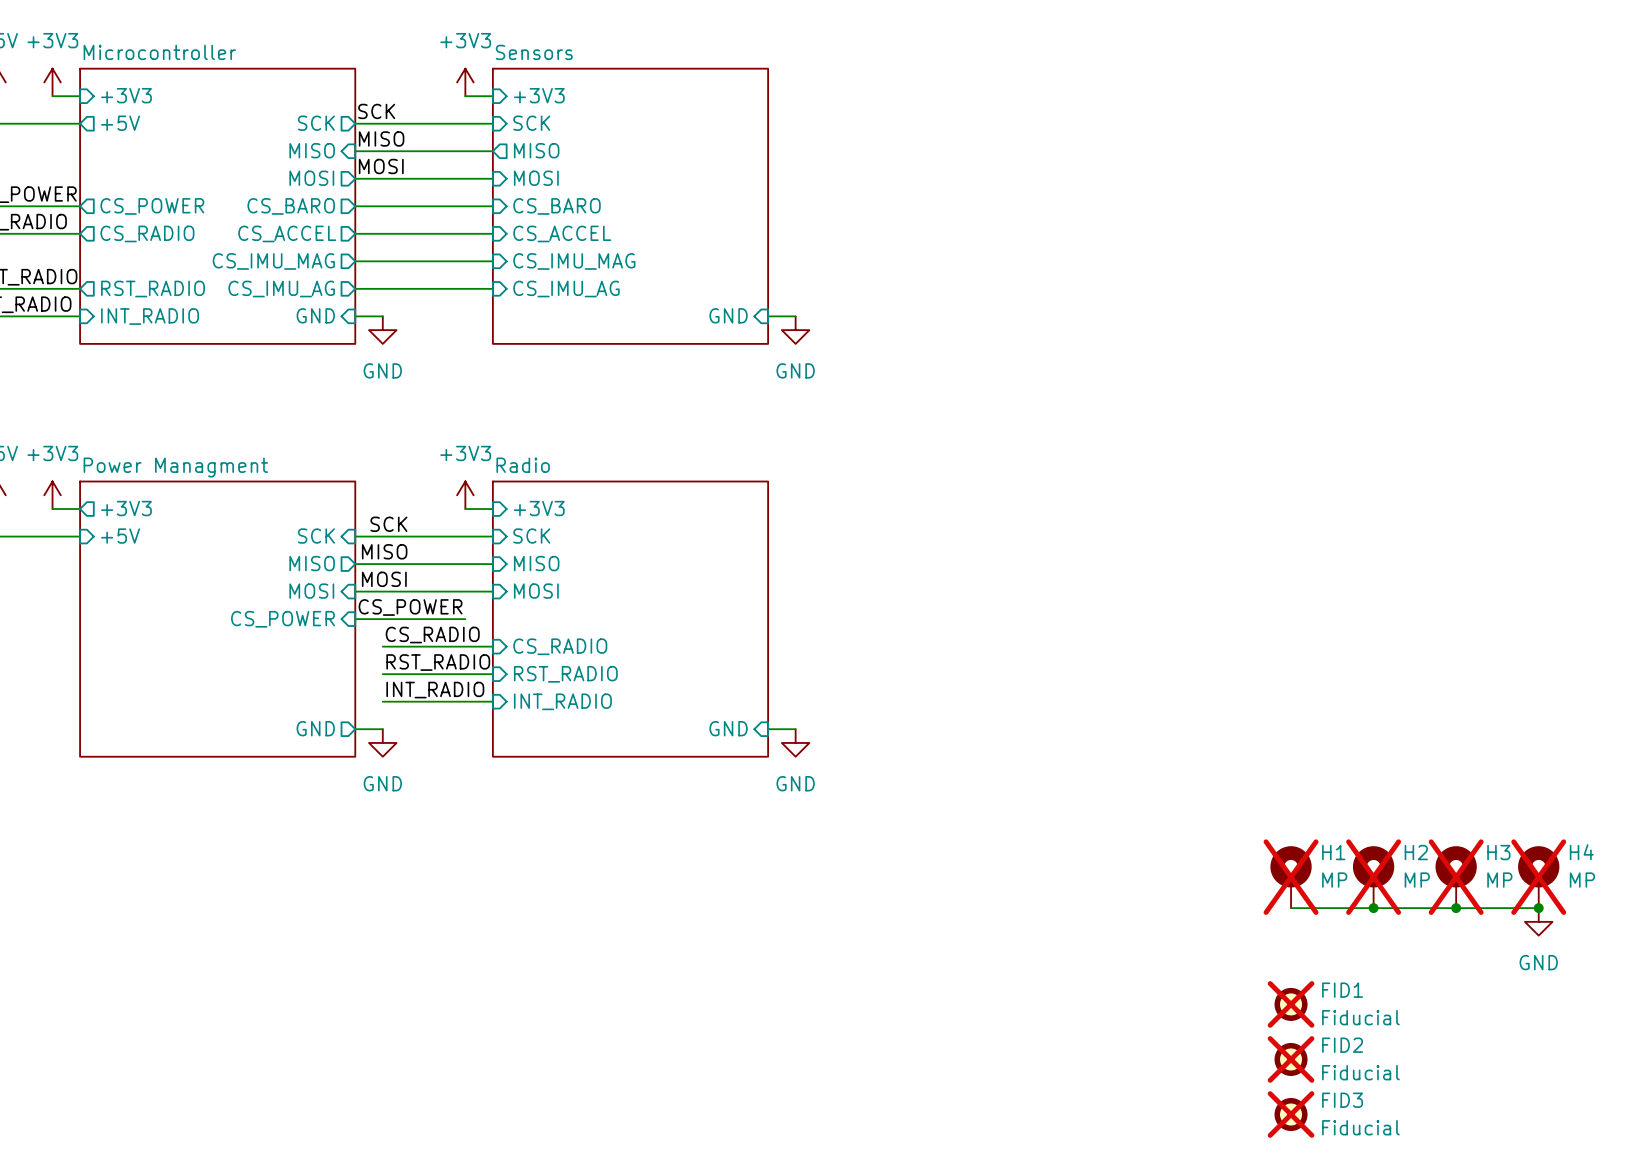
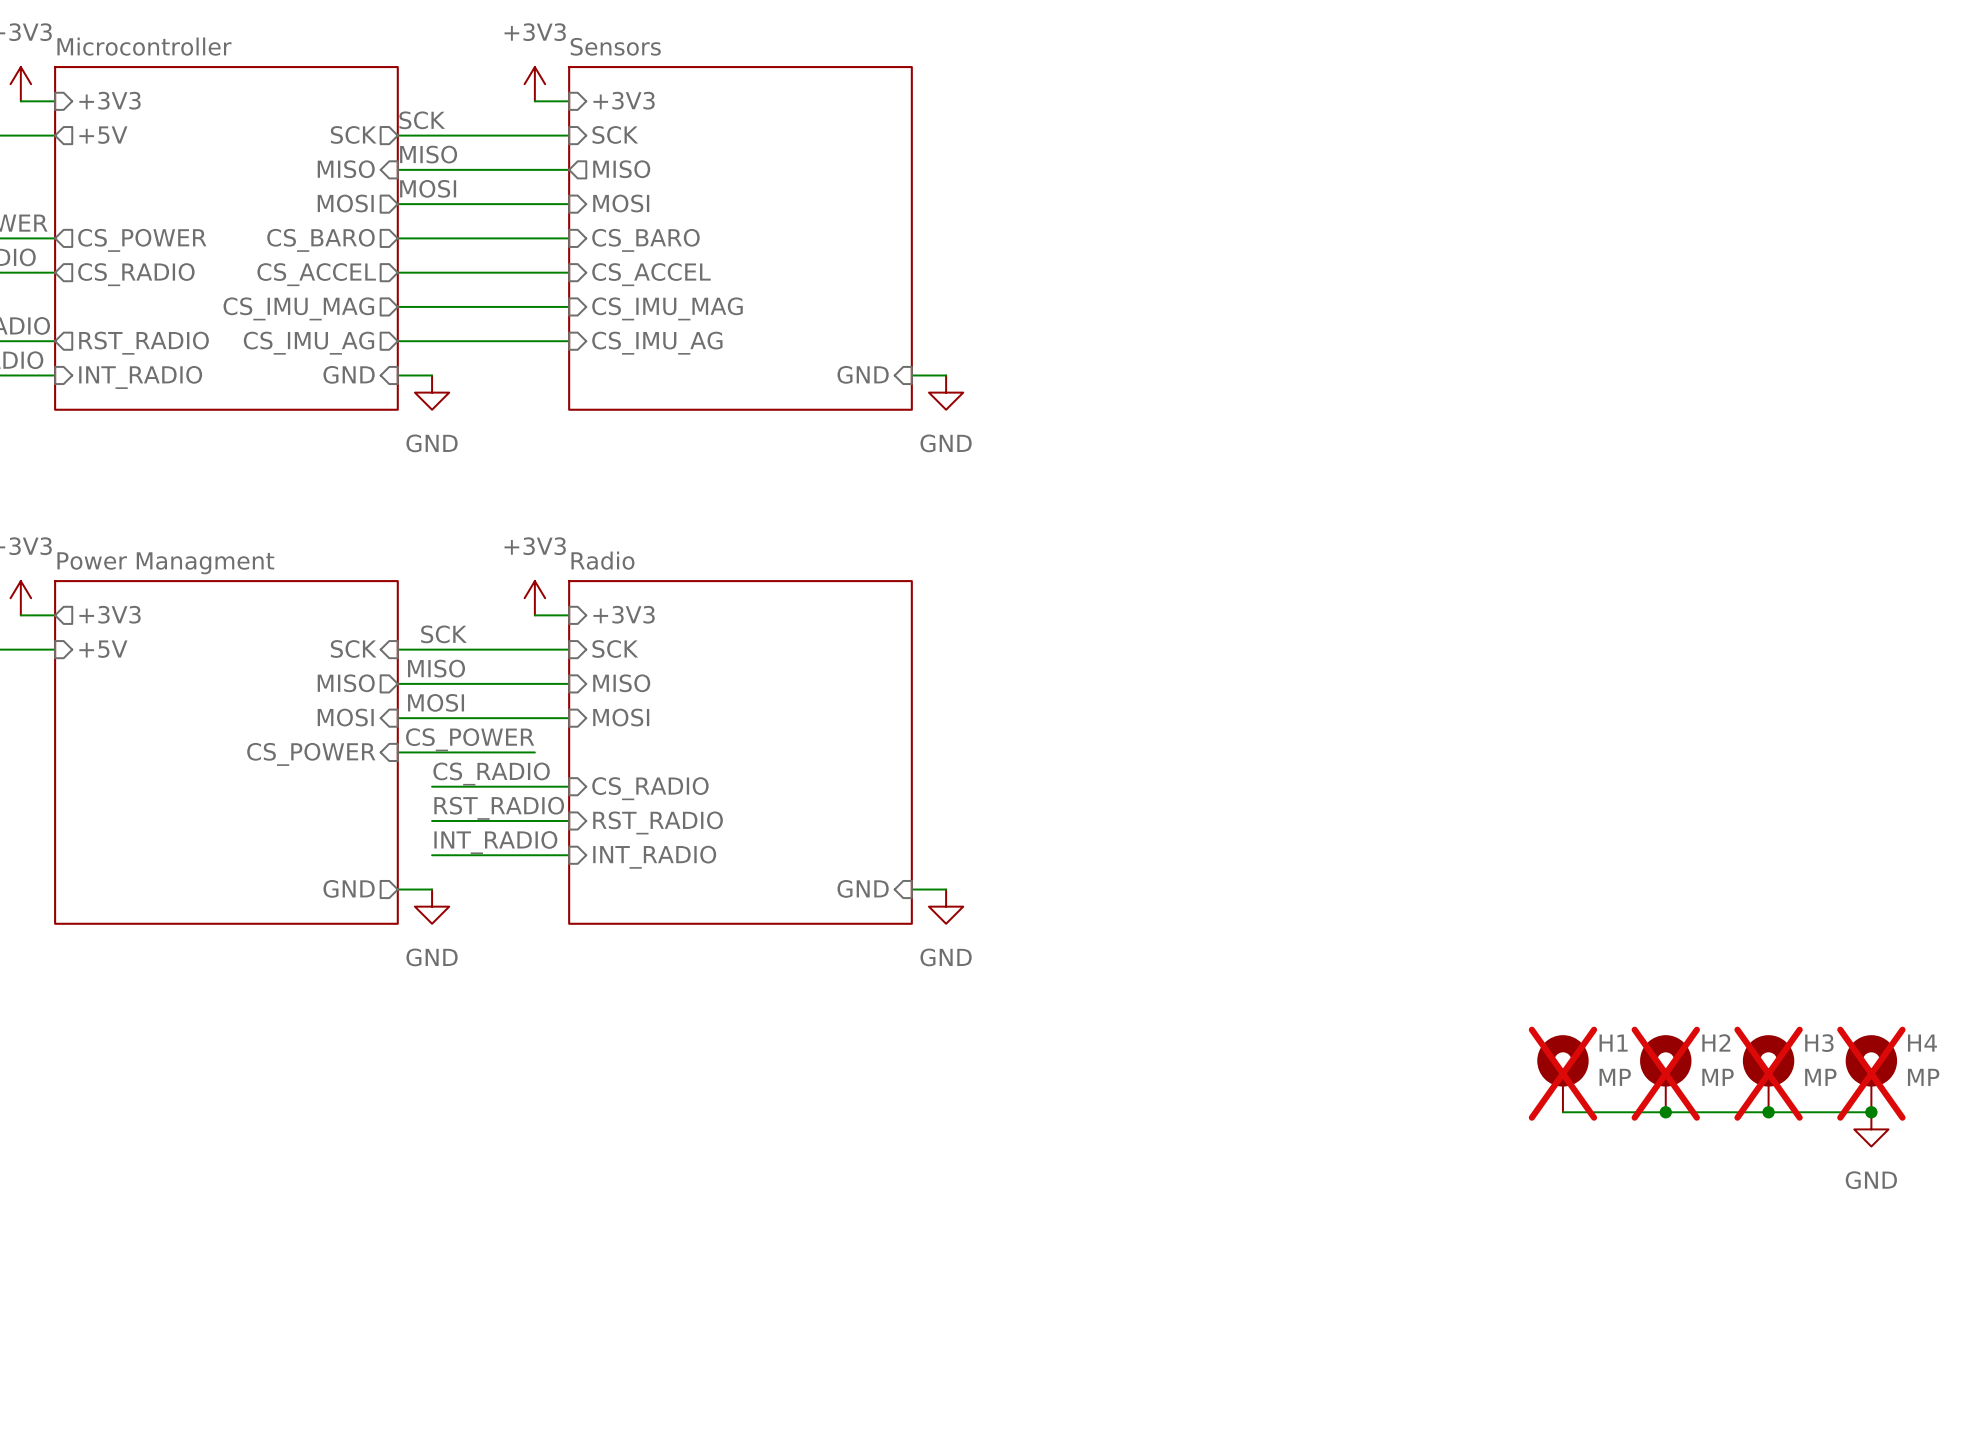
FID1: Fiducial (1291, 1004) -> none
FID2: Fiducial (1291, 1059) -> none
FID3: Fiducial (1291, 1114) -> none

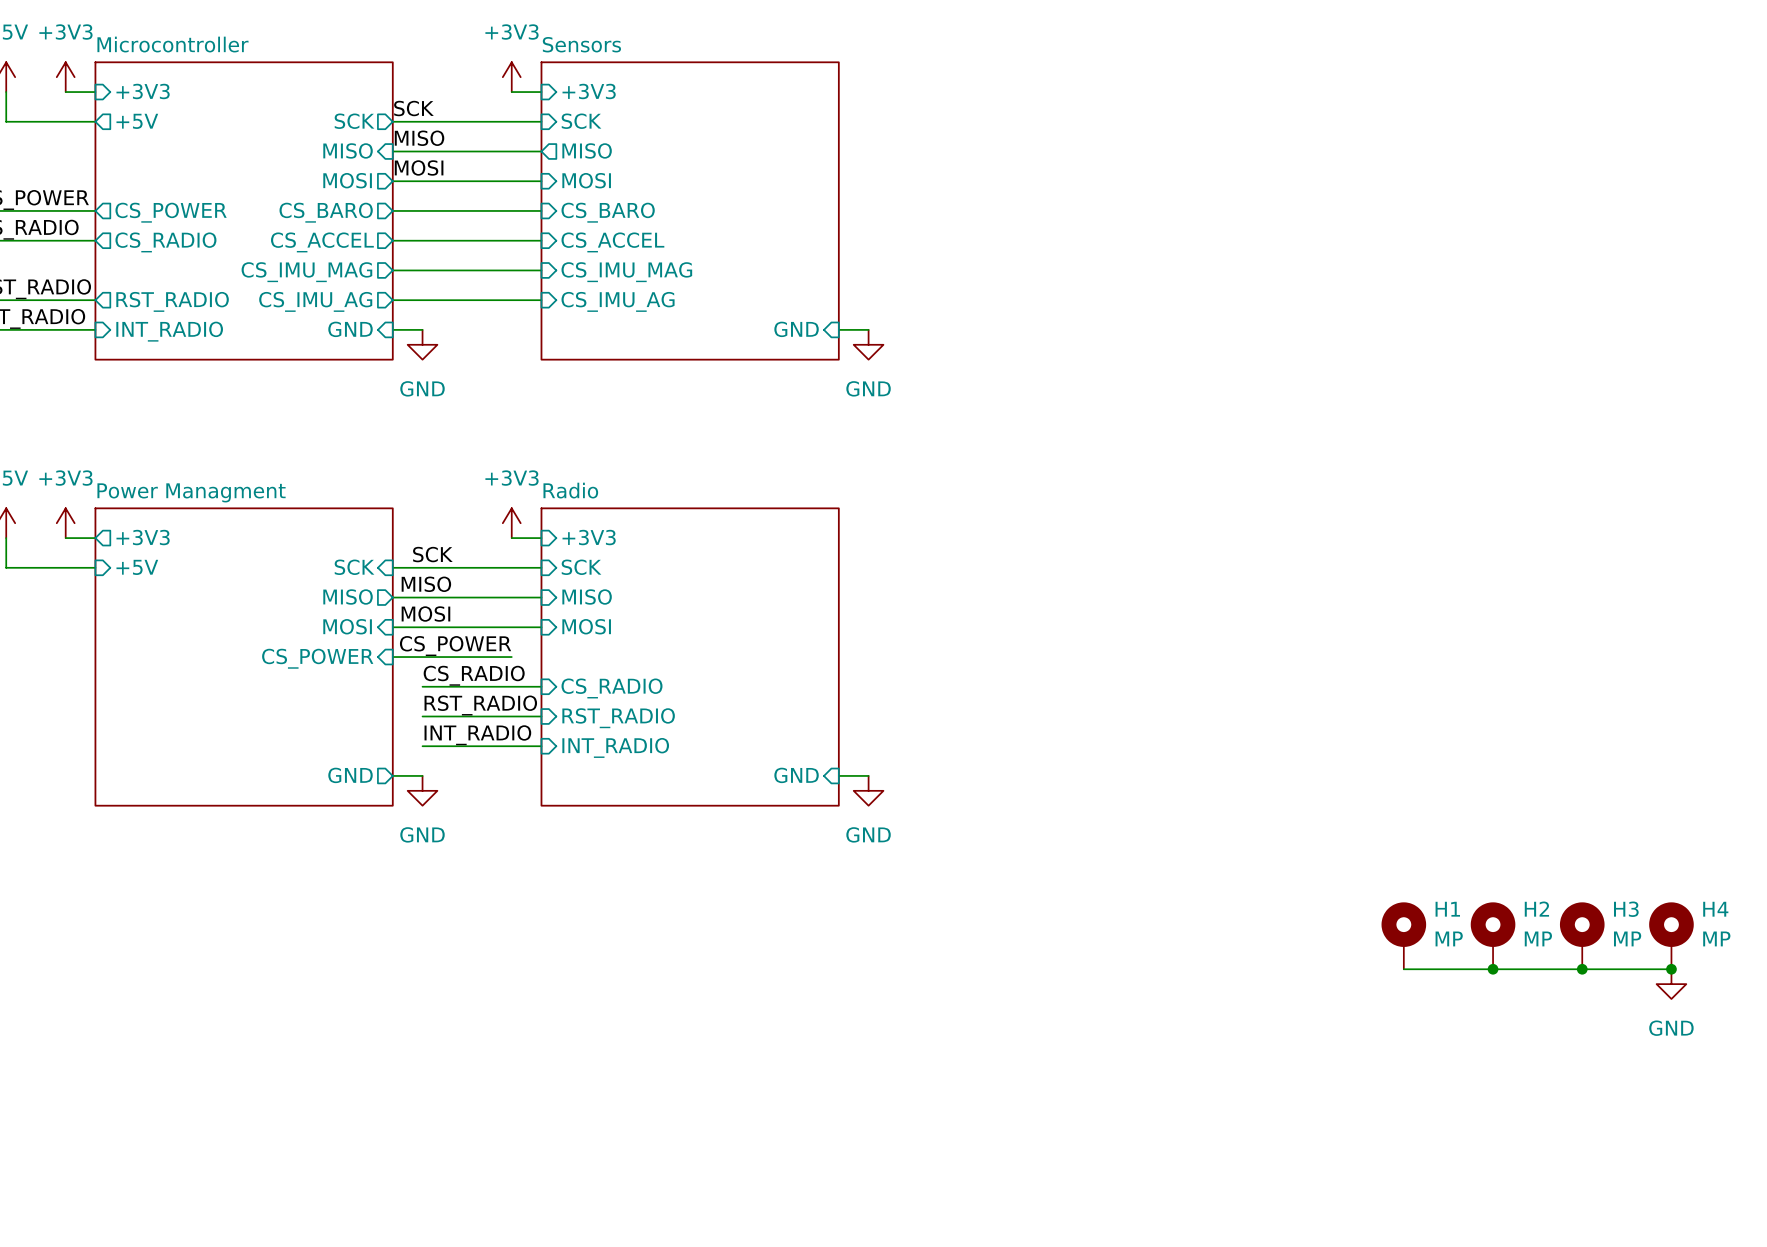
H1 do-not-place cross: (1562, 1073) -> none
H2 do-not-place cross: (1665, 1073) -> none
H3 do-not-place cross: (1768, 1073) -> none
H4 do-not-place cross: (1871, 1073) -> none

